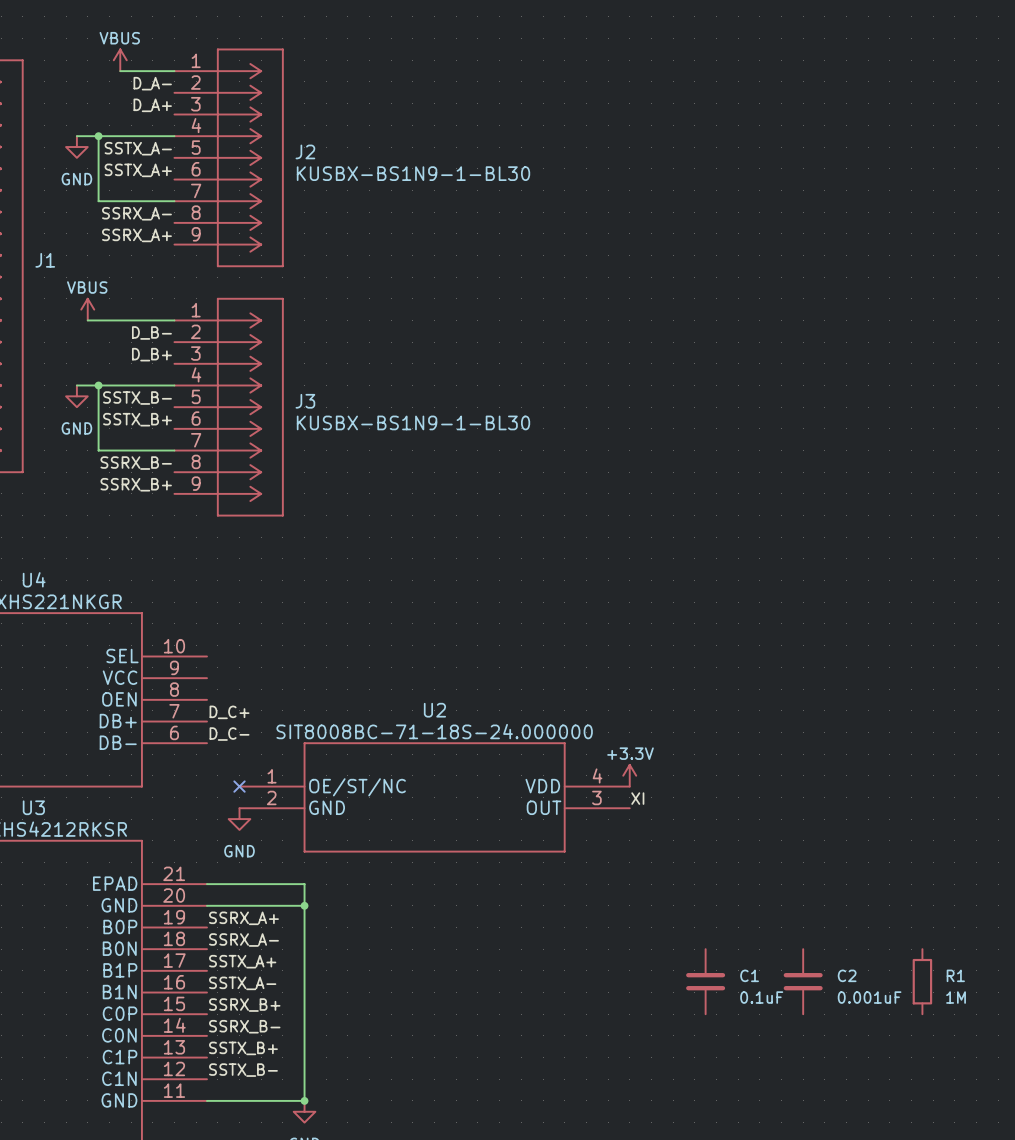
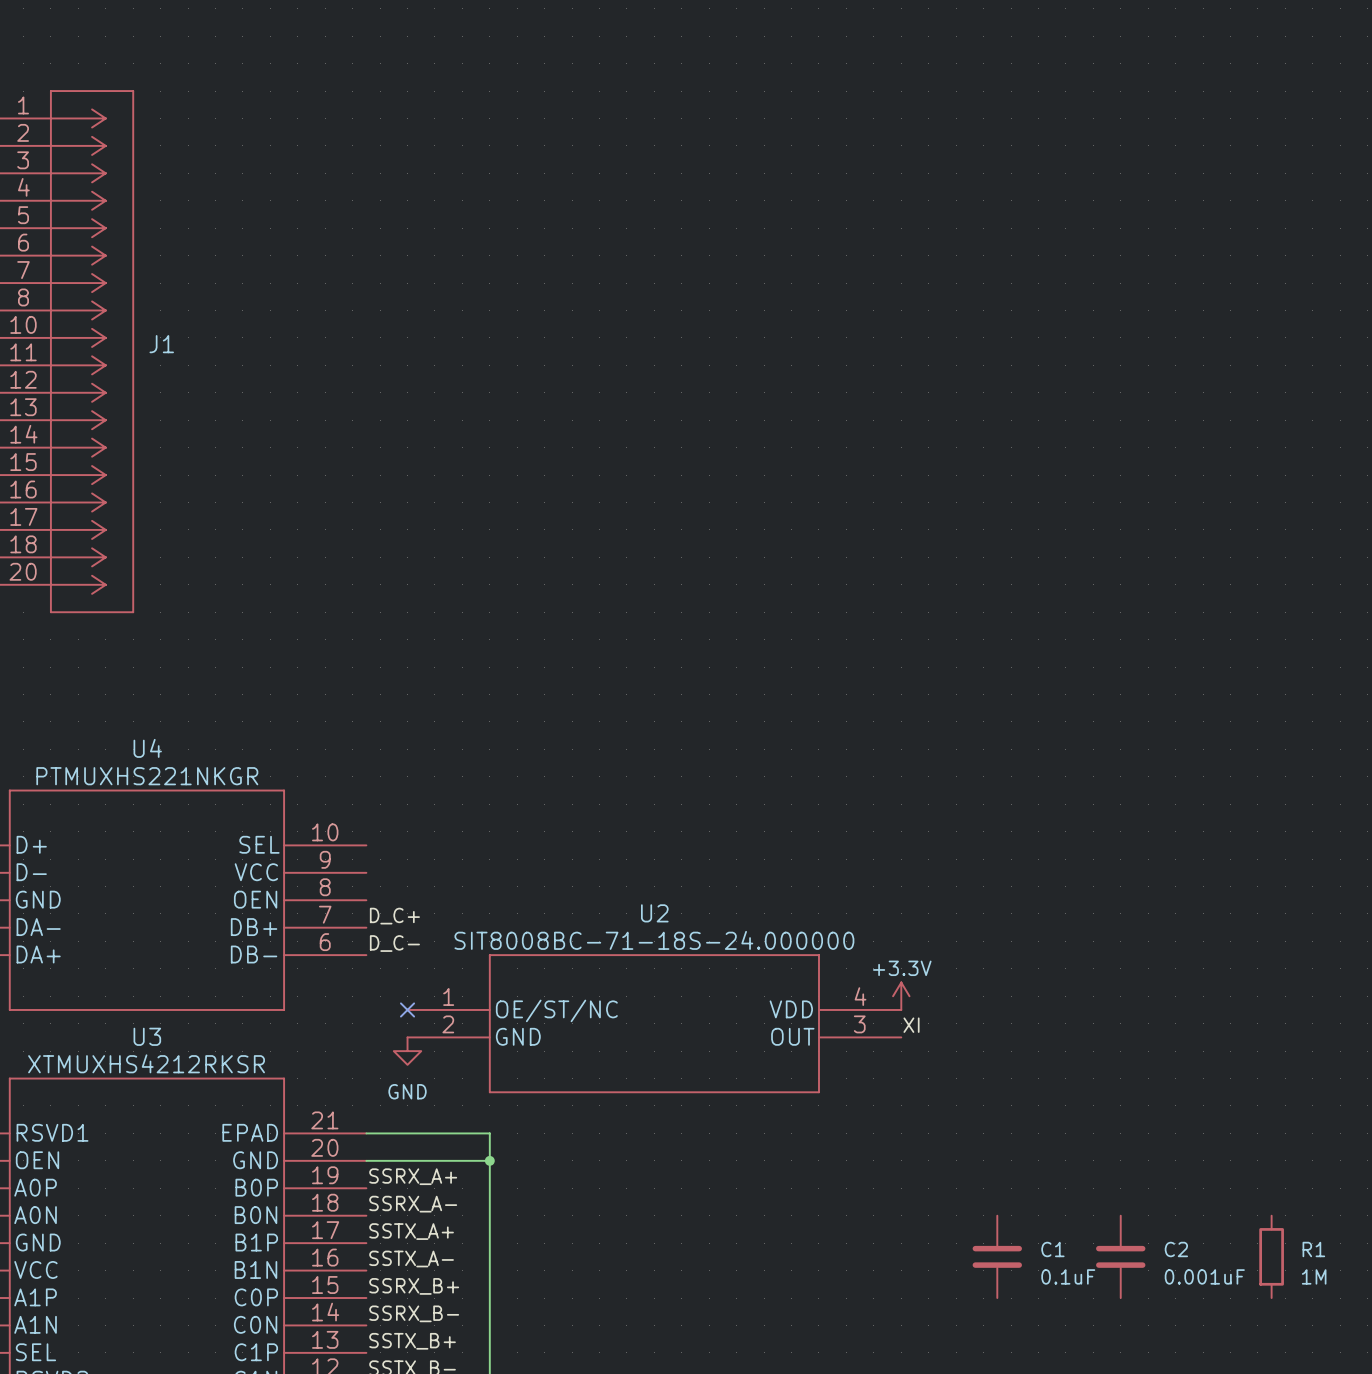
power symbol: VBUS (120, 60) -> none
wire: (120, 71) (174, 71) -> none
label: D_A- (152, 83) -> none
label: D_A+ (152, 105) -> none
wire: (76, 136) (174, 136) -> none
wire: (98, 136) (98, 201) (174, 201) -> none
junction: (98, 136) -> none
power symbol: GND (76, 147) -> none
label: SSTX_A- (138, 148) -> none
J2: KUSBX-BS1N9-1-BL30 (228, 157) -> none
label: SSTX_A+ (138, 170) -> none
label: SSRX_A- (136, 213) -> none
label: SSRX_A+ (136, 235) -> none
power symbol: VBUS (87, 309) -> none
wire: (87, 320) (174, 320) -> none
label: D_B- (151, 332) -> none
label: D_B+ (151, 354) -> none
wire: (76, 385) (174, 385) -> none
wire: (98, 385) (98, 450) (174, 450) -> none
junction: (98, 385) -> none
power symbol: GND (76, 396) -> none
label: SSTX_B- (137, 398) -> none
J3: KUSBX-BS1N9-1-BL30 (228, 407) -> none
label: SSTX_B+ (137, 419) -> none
label: SSRX_B- (136, 463) -> none
label: SSRX_B+ (136, 484) -> none

